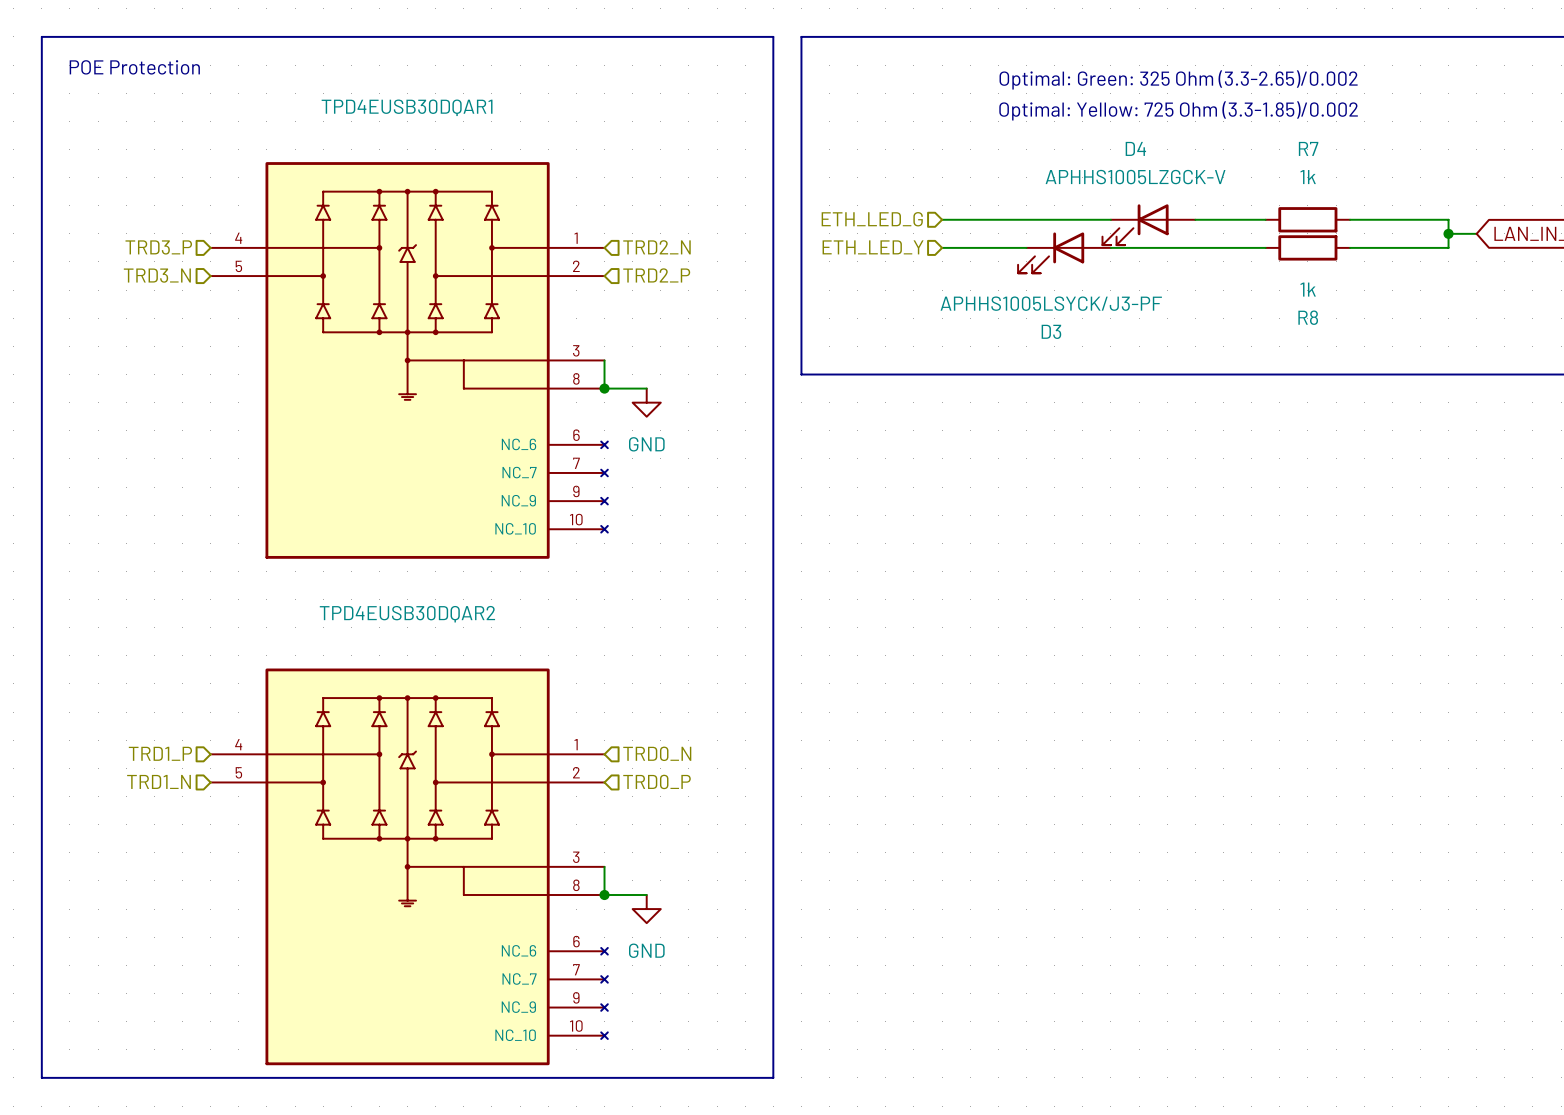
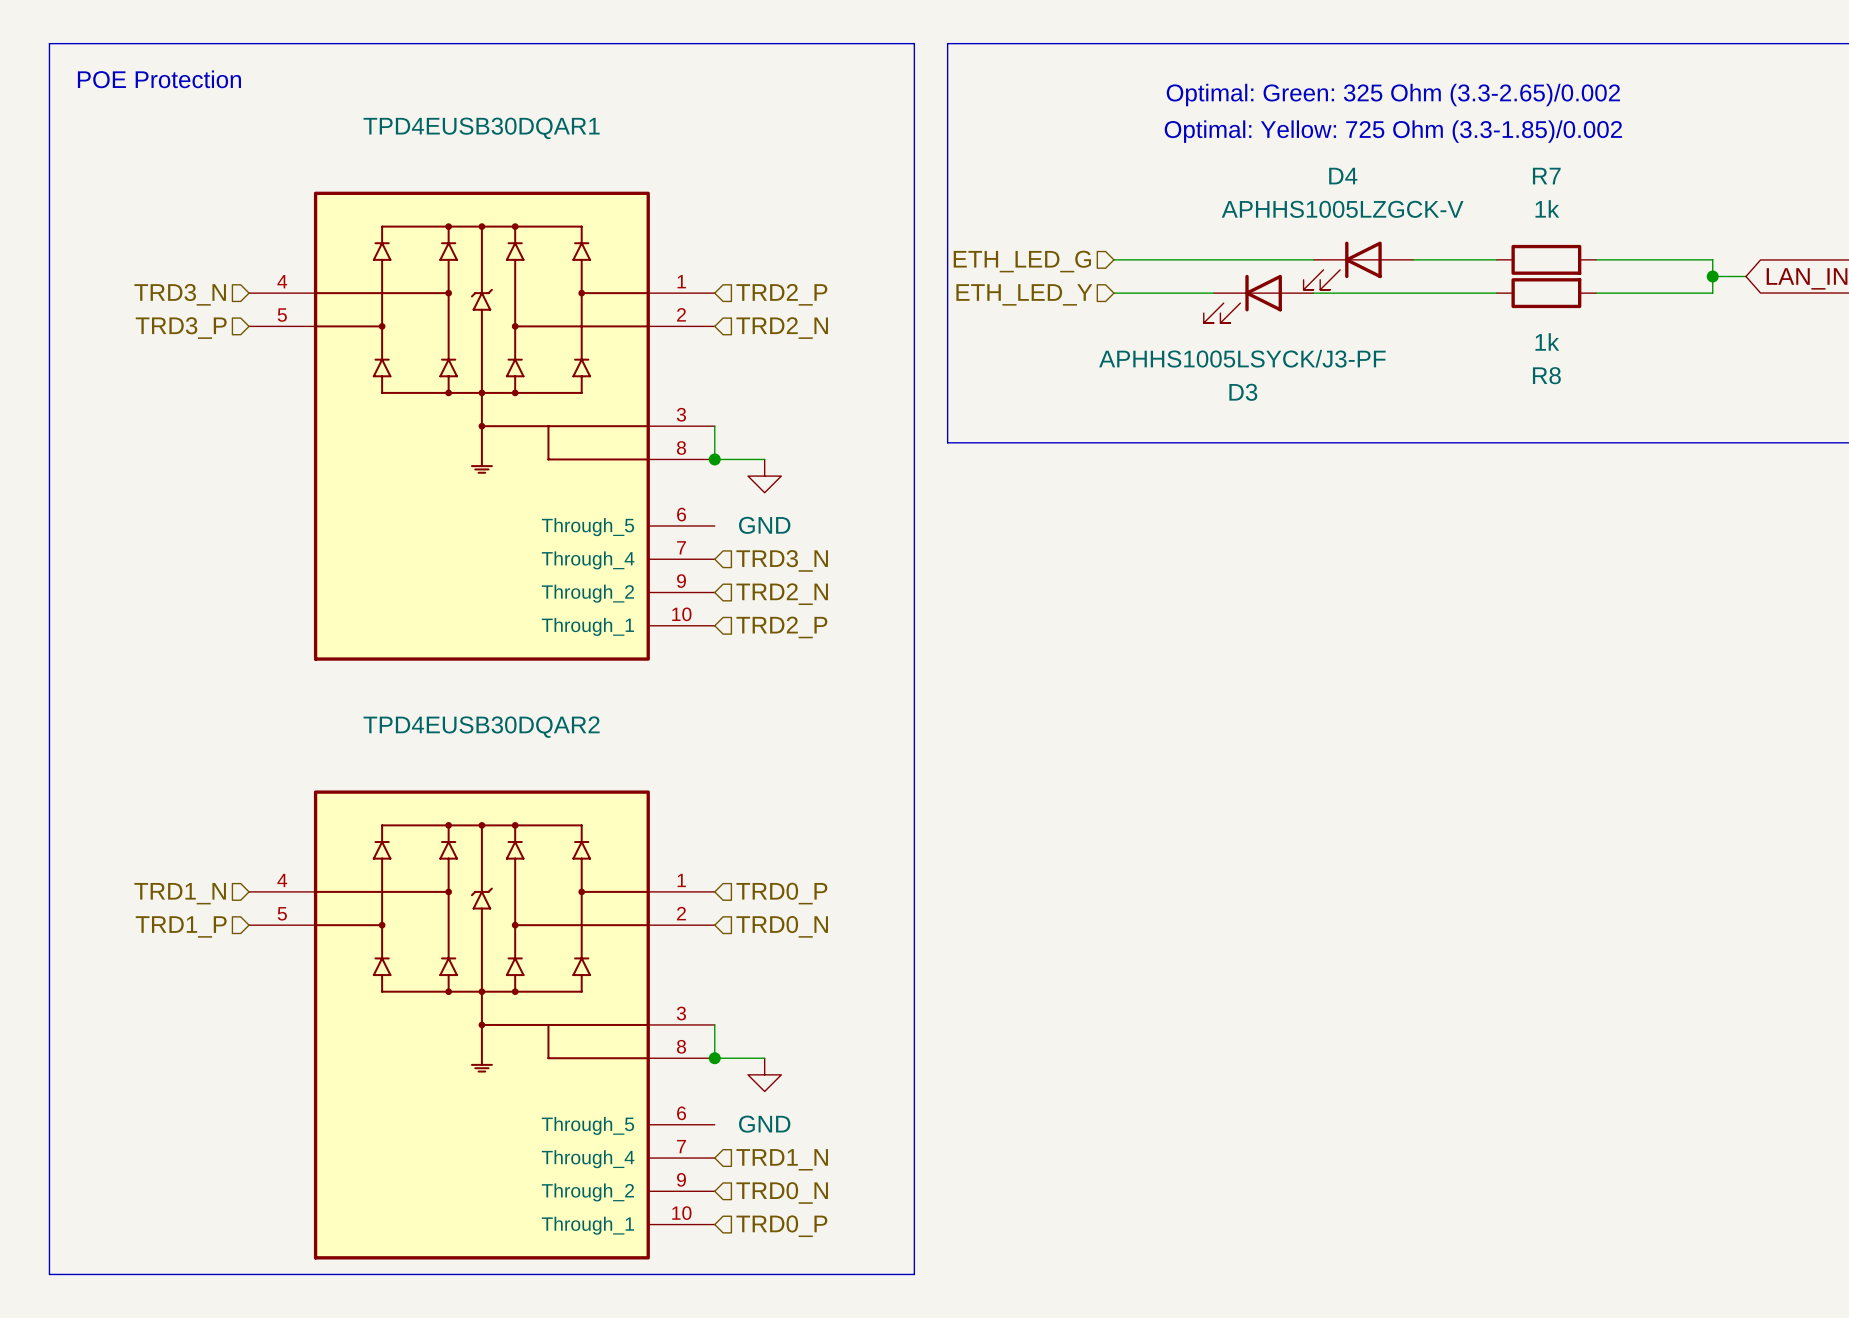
TPD4EUSB30DQAR1 symbol: [210, 162, 608, 559] -> [249, 191, 715, 661]
hierarchical label: TRD3_P (158, 247) -> TRD3_N (180, 294)
hierarchical label: TRD2_N (656, 247) -> TRD2_P (781, 294)
hierarchical label: TRD3_N (157, 275) -> TRD3_P (181, 328)
hierarchical label: TRD2_P (656, 275) -> TRD2_N (782, 328)
hierarchical label: none -> TRD3_N (782, 560)
hierarchical label: none -> TRD2_N (782, 594)
hierarchical label: none -> TRD2_P (781, 627)
TPD4EUSB30DQAR2 symbol: [210, 668, 608, 1066] -> [249, 790, 715, 1260]
hierarchical label: TRD1_P (160, 753) -> TRD1_N (180, 893)
hierarchical label: TRD0_N (657, 753) -> TRD0_P (781, 893)
hierarchical label: TRD1_N (159, 781) -> TRD1_P (181, 926)
hierarchical label: TRD0_P (657, 781) -> TRD0_N (782, 926)
hierarchical label: none -> TRD1_N (782, 1159)
hierarchical label: none -> TRD0_N (782, 1192)
hierarchical label: none -> TRD0_P (781, 1226)

